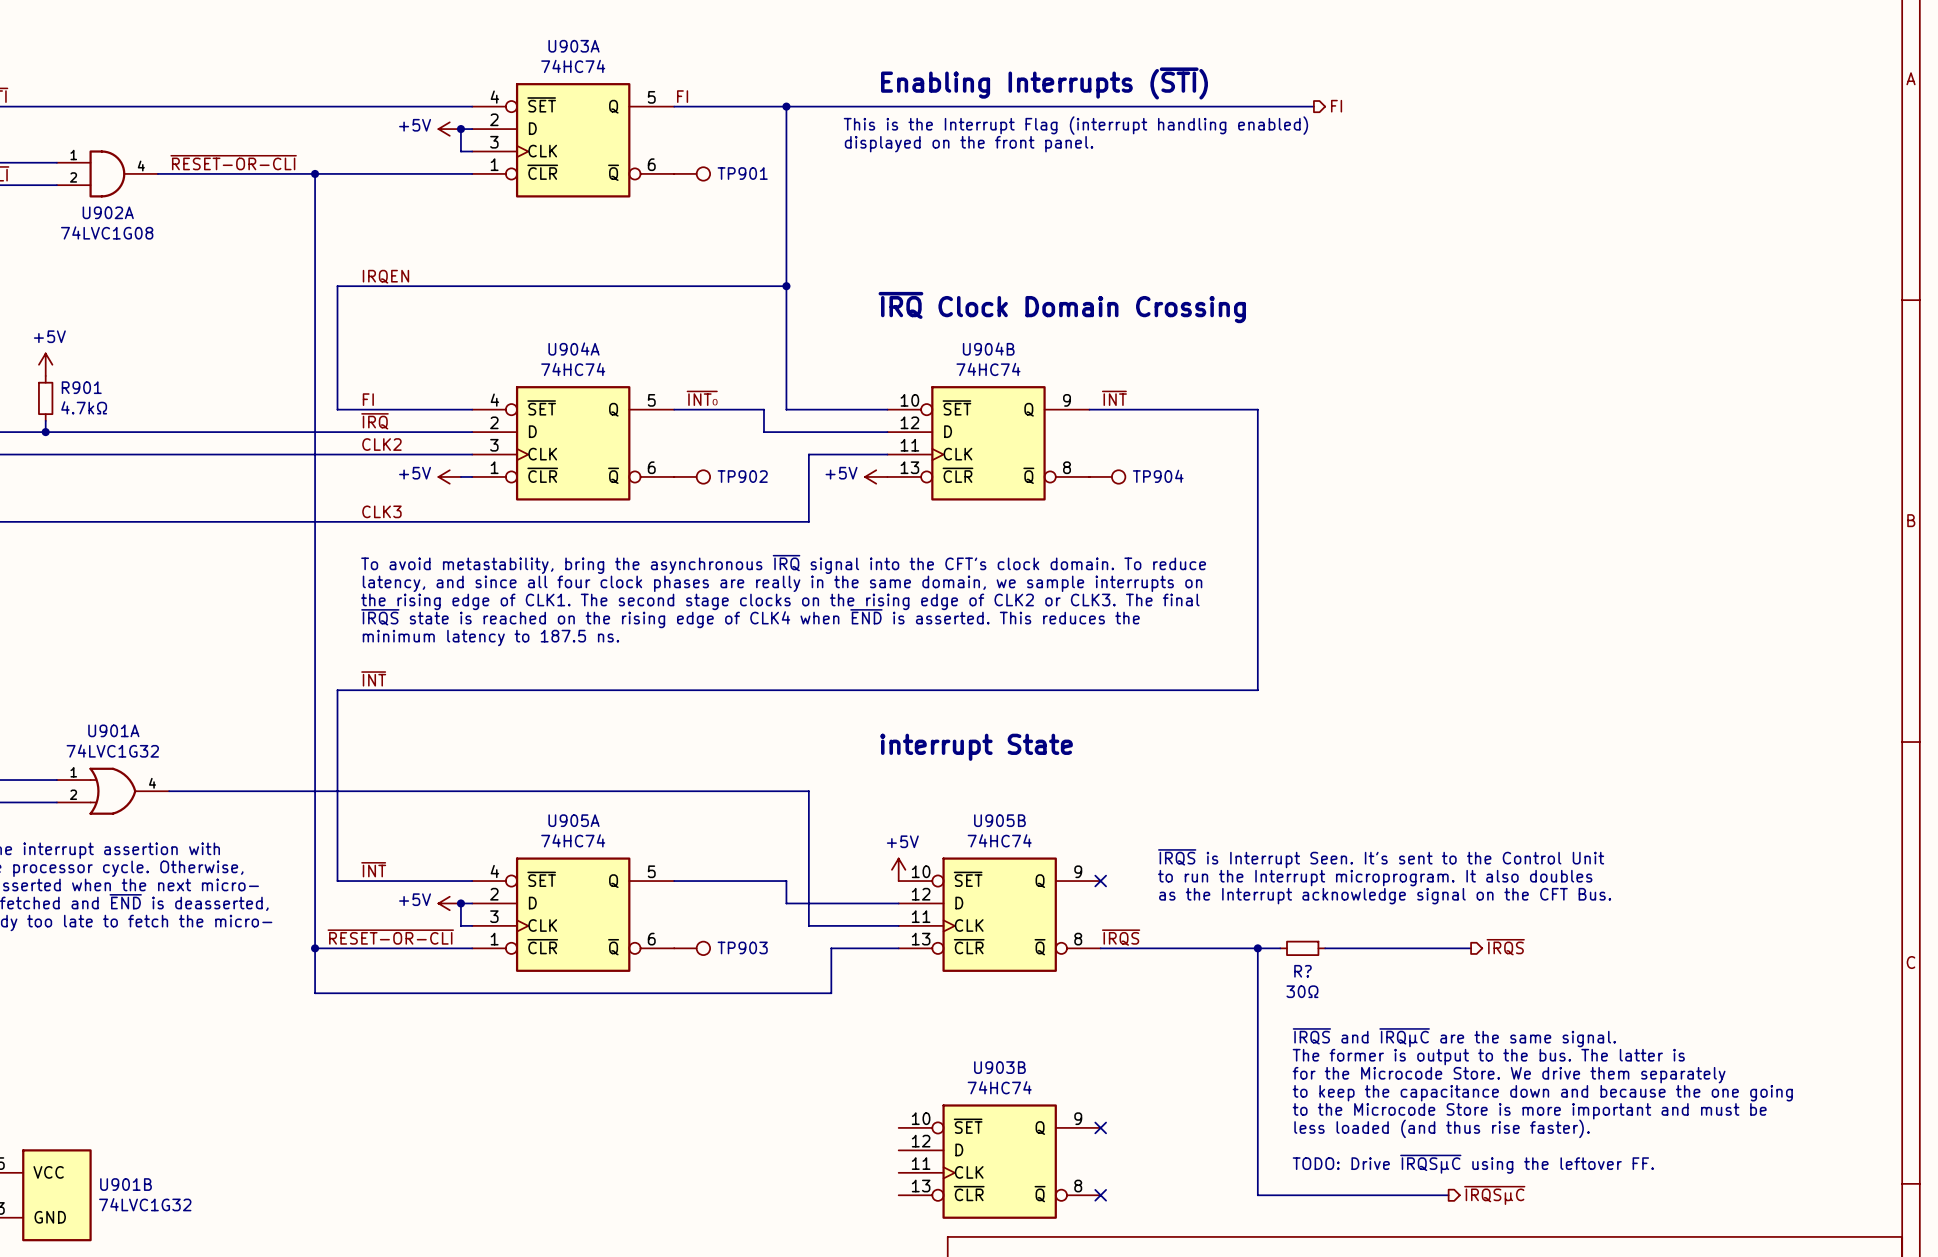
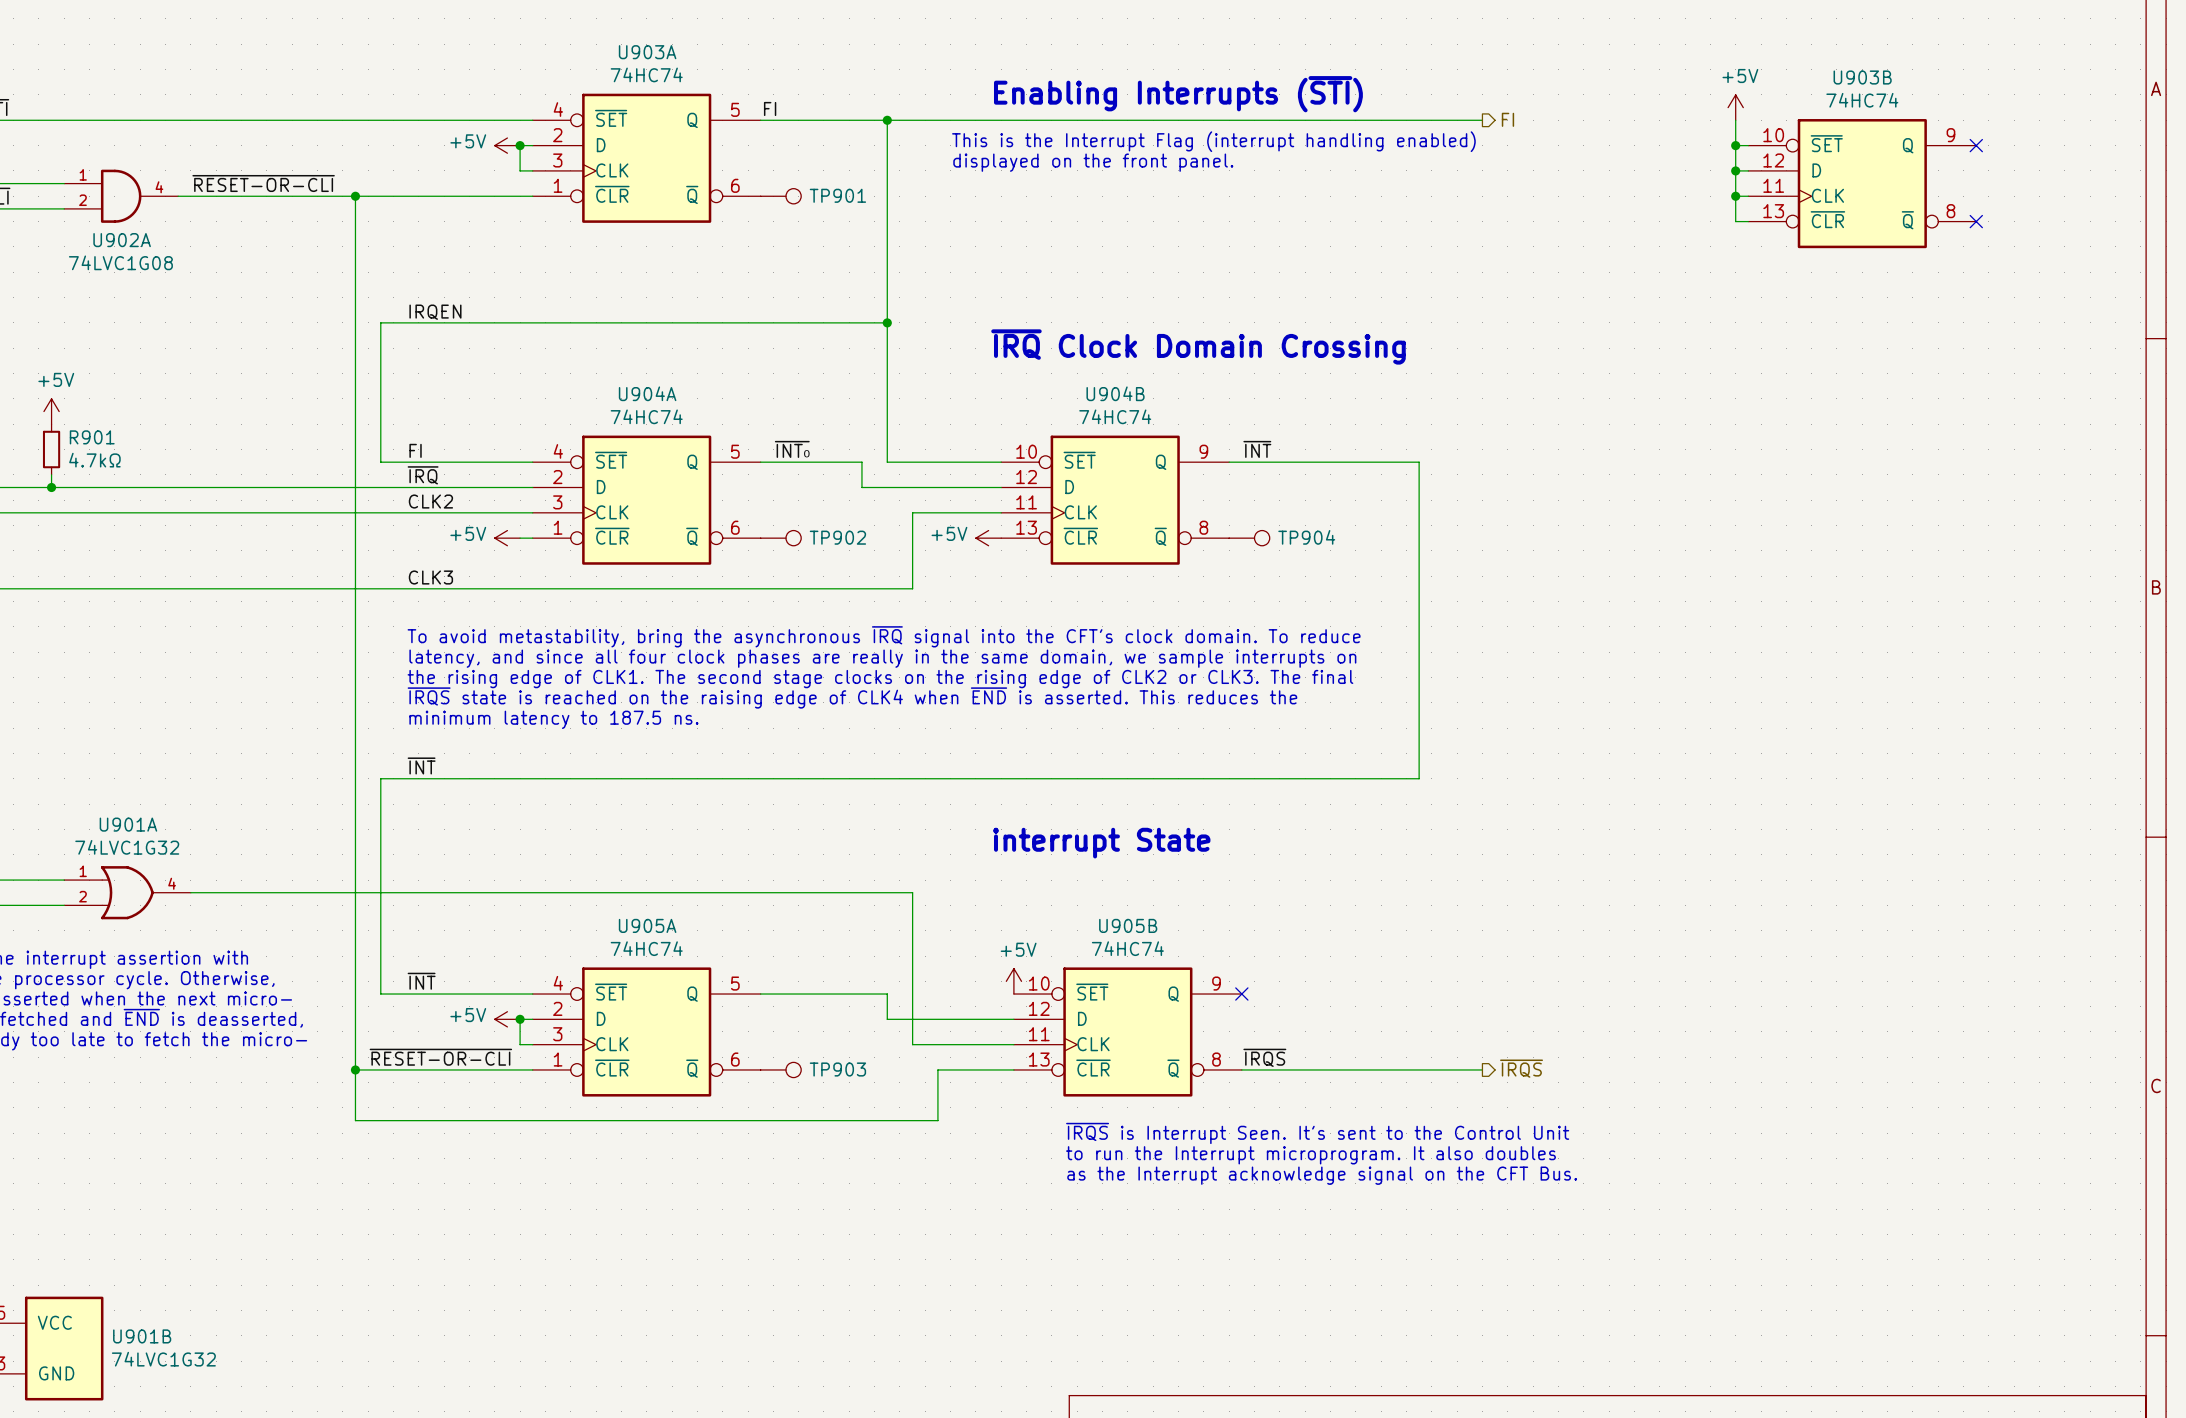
power symbol: none -> +5V (1735, 107)
wire: none -> (1735, 120) (1735, 221) (1748, 221)
wire: none -> (1735, 145) (1748, 145)
junction: none -> (1735, 145)
no-connect mark: none -> (1976, 145)
wire: none -> (1735, 170) (1748, 170)
junction: none -> (1735, 170)
wire: none -> (1735, 196) (1748, 196)
junction: none -> (1735, 196)
no-connect mark: none -> (1976, 221)
text: ~{IRQS} state is reached on the rising edge of CLK4 when ~{END} is asserted. This reduces the (750, 618) -> ~{IRQS} state is reached on the raising edge of CLK4 when ~{END} is asserted. This reduces the (852, 697)
text: ~{IRQS} is Interrupt Seen. It's sent to the Control Unit (1381, 858) -> none
text: to run the Interrupt microprogram. It also doubles (1375, 878) -> none
text: as the Interrupt acknowledge signal on the CFT Bus. (1385, 896) -> none
hierarchical label position: ~{IRQS} (1505, 947) -> ~{IRQS} (1521, 1068)
wire: (1257, 948) (1257, 1195) (1448, 1195) -> none
junction: (1257, 948) -> none
wire: none -> (1444, 1069) (1482, 1069)
R?: 30Ω (1302, 948) -> none
wire: (1325, 948) (1471, 948) -> none
text: none -> ~{IRQS} is Interrupt Seen. It's sent to the Control Unit (1317, 1133)
text: none -> to run the Interrupt microprogram. It also doubles (1310, 1155)
text: ~{IRQS} and ~{IRQµC} are the same signal. (1454, 1037) -> none
text: none -> as the Interrupt acknowledge signal on the CFT Bus. (1322, 1175)
text: The former is output to the bus. The latter is (1488, 1057) -> none
text: for the Microcode Store. We drive them separately (1509, 1075) -> none
text: to keep the capacitance down and because the one going (1542, 1093) -> none
text: to the Microcode Store is more important and must be (1529, 1111) -> none
no-connect mark: (1100, 1127) -> none
text: less loaded (and thus rise faster). (1442, 1128) -> none
U903B position: (999, 1161) -> (1862, 183)
text: TODO: Drive ~{IRQSµC} using the leftover FF. (1473, 1164) -> none
no-connect mark: (1100, 1195) -> none
hierarchical label: ~{IRQSµC} (1494, 1195) -> none

